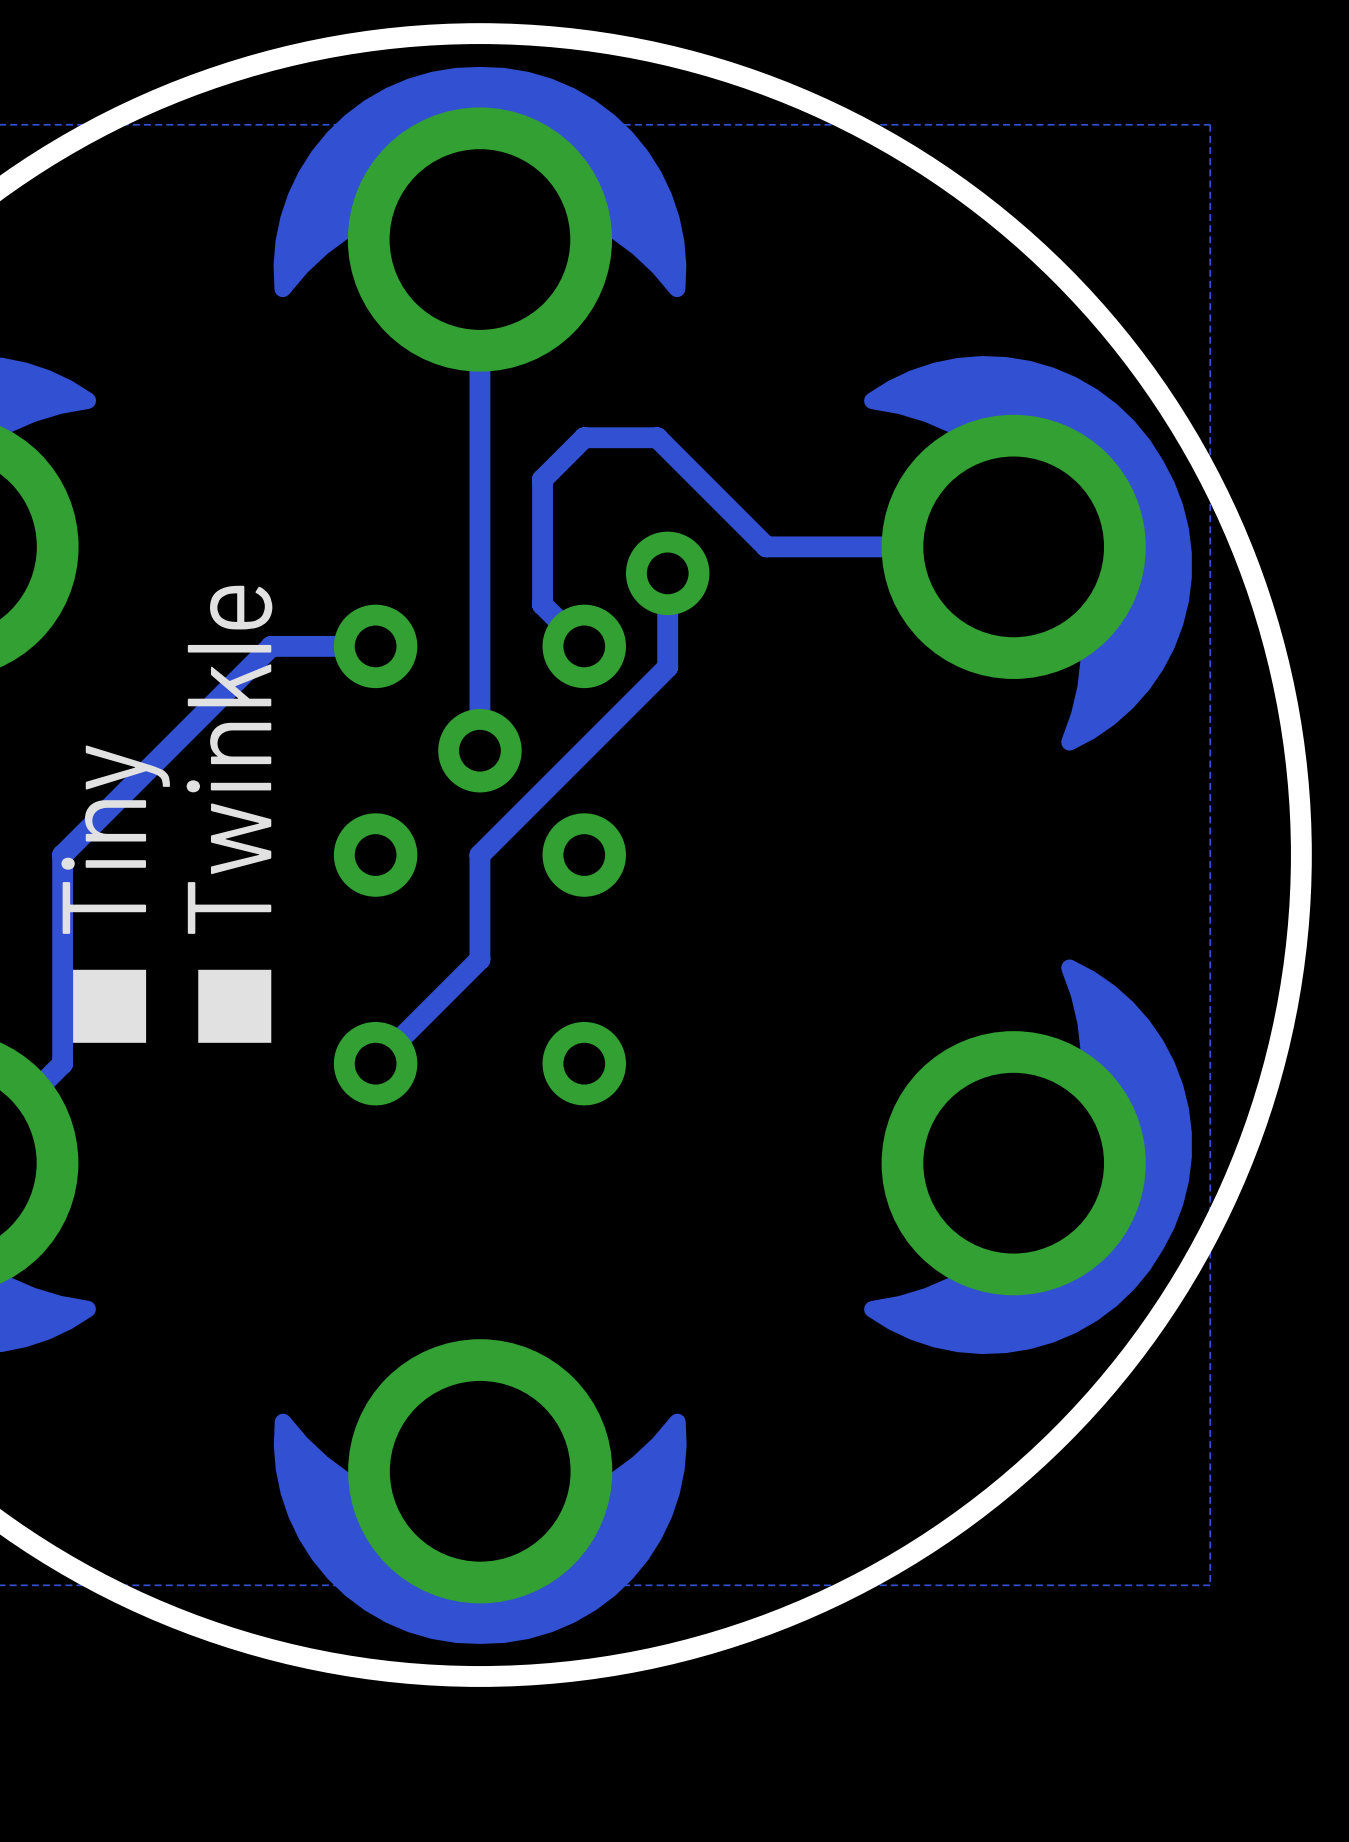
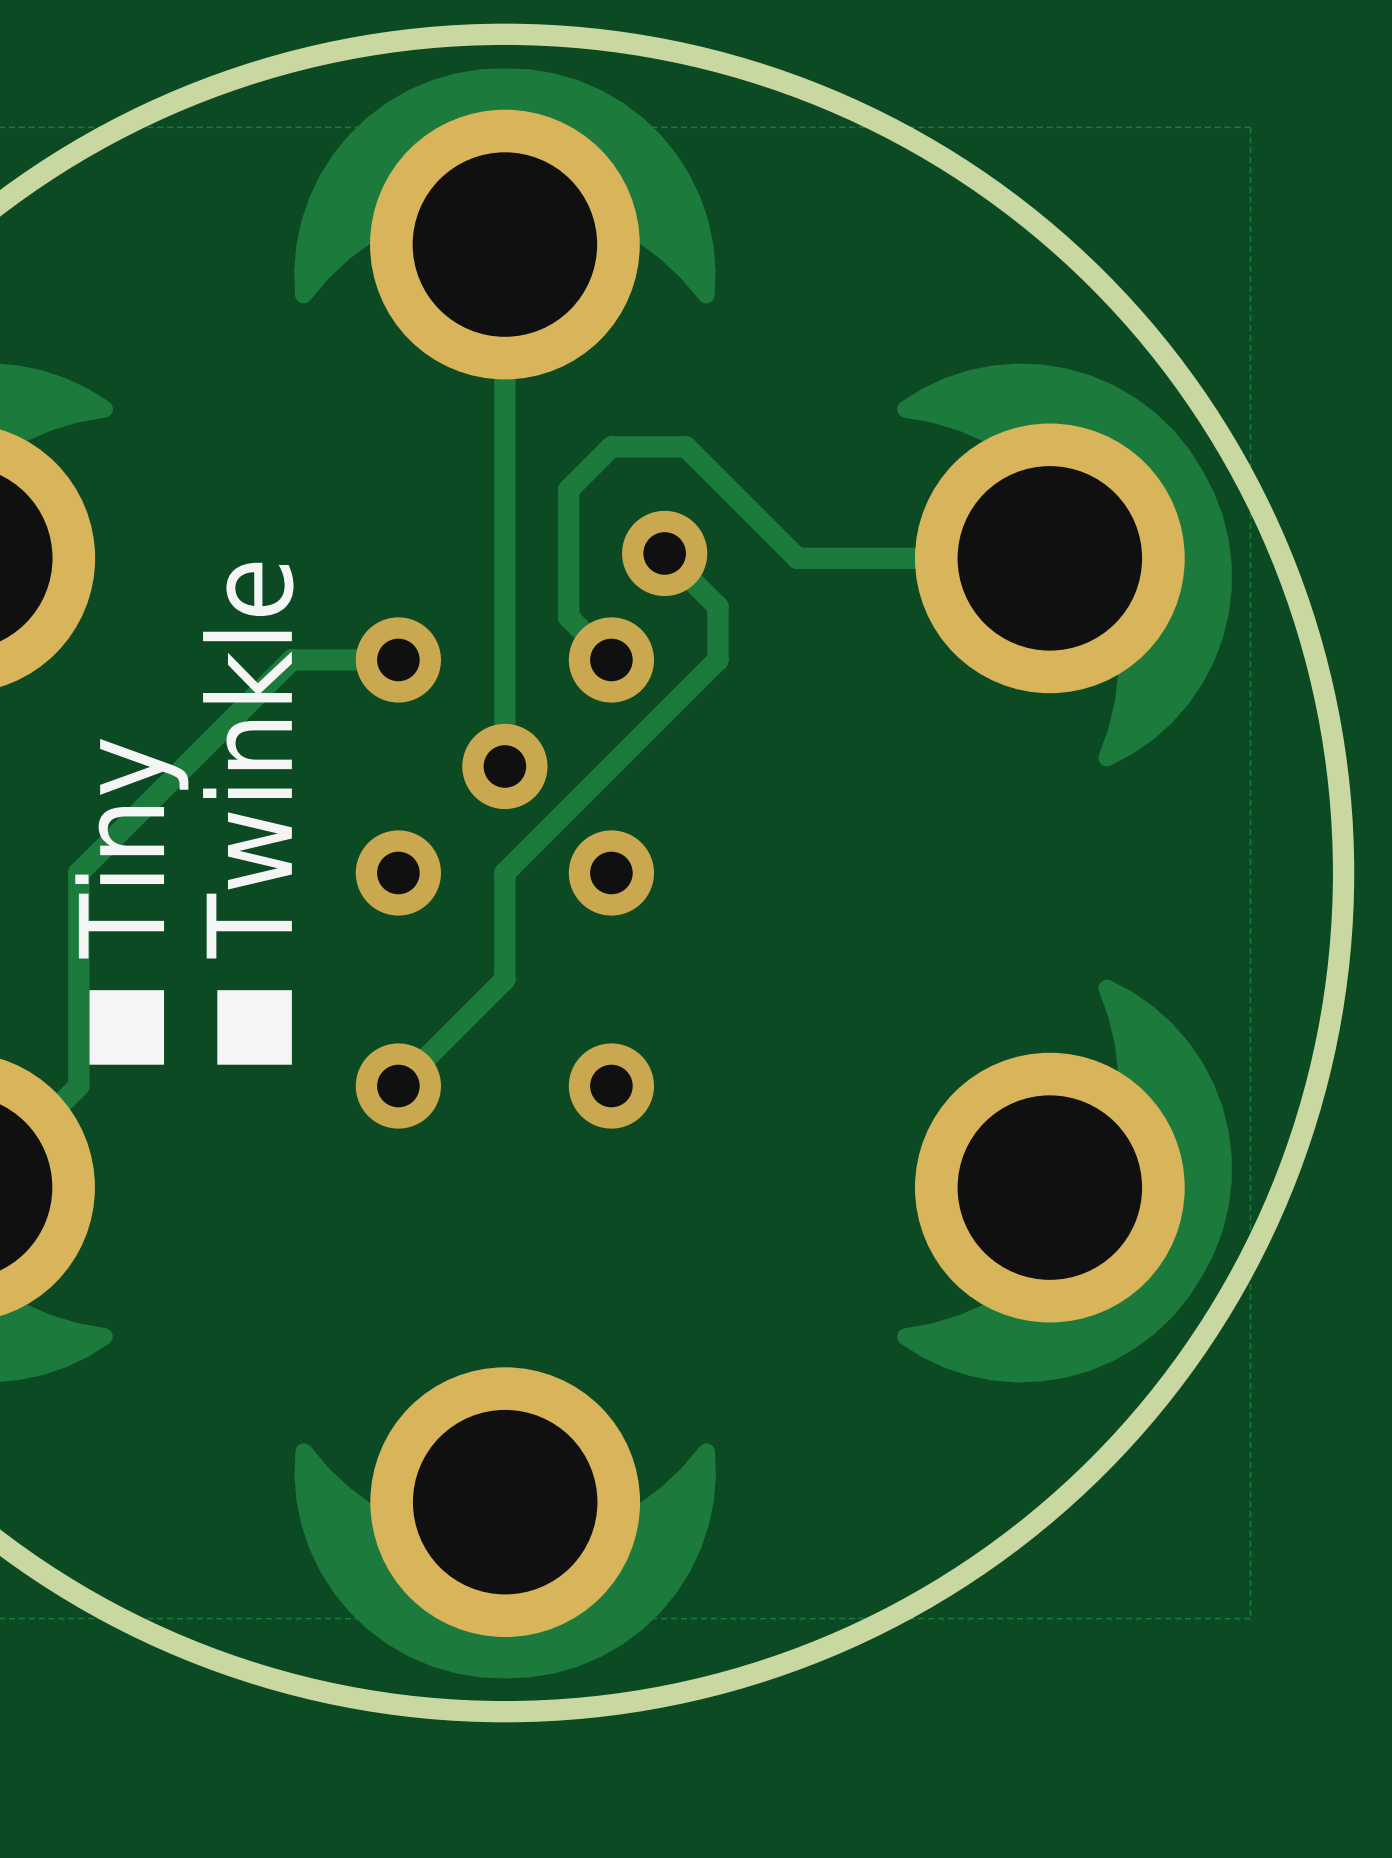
track: (667, 573) (667, 667) -> (664, 553) (717, 606) (717, 659) (696, 681)
via position: (667, 573) -> (664, 553)

